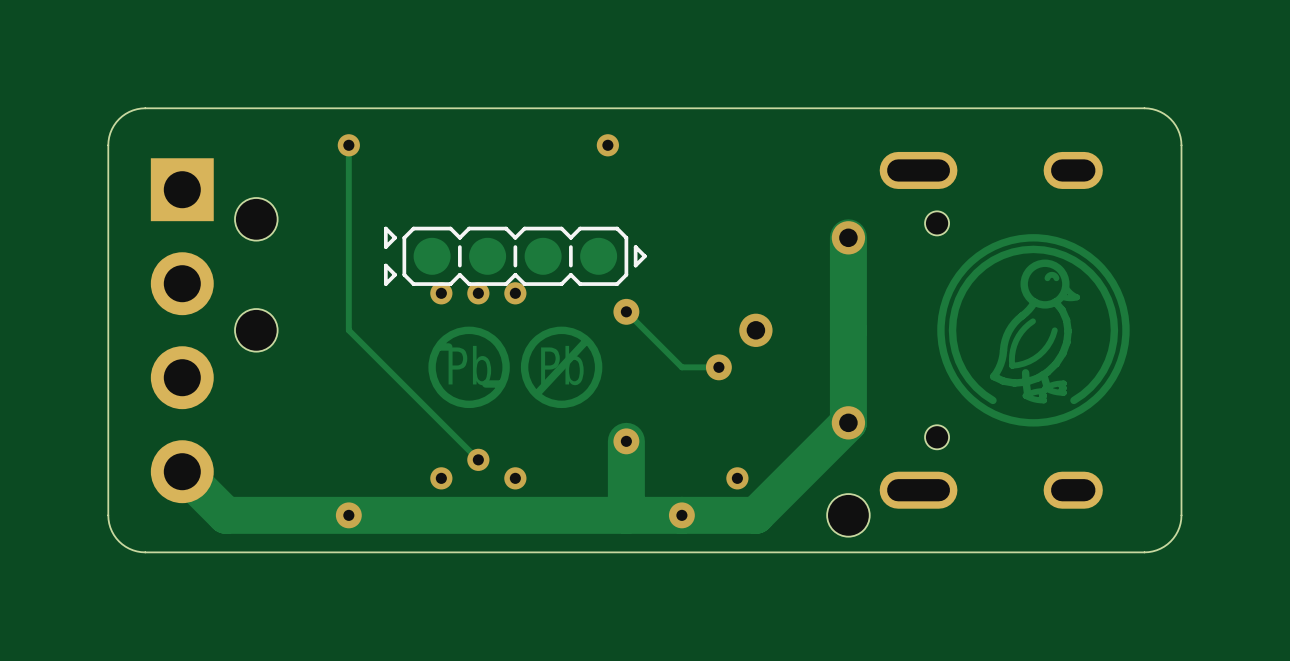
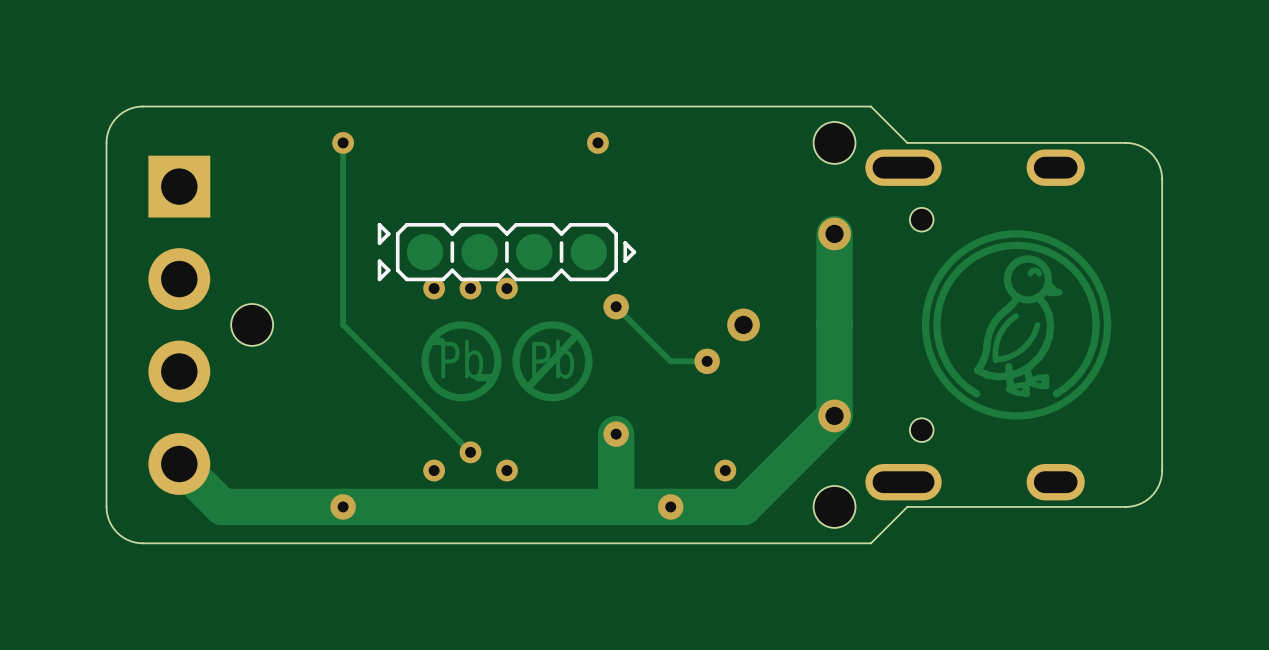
board edge: (885, 108) (1152, 109) (1167, 116) (1179, 133) (1181, 145) (1181, 182) -> (870, 106) (907, 142) (1133, 143) (1145, 148) (1154, 156) (1160, 167) (1162, 179)
part position: (256, 219) -> (834, 142)
board edge: (1181, 478) (1181, 515) (1179, 527) (1167, 544) (1152, 551) (885, 552) -> (1162, 470) (1160, 482) (1154, 493) (1145, 501) (1133, 506) (907, 506) (870, 543)

